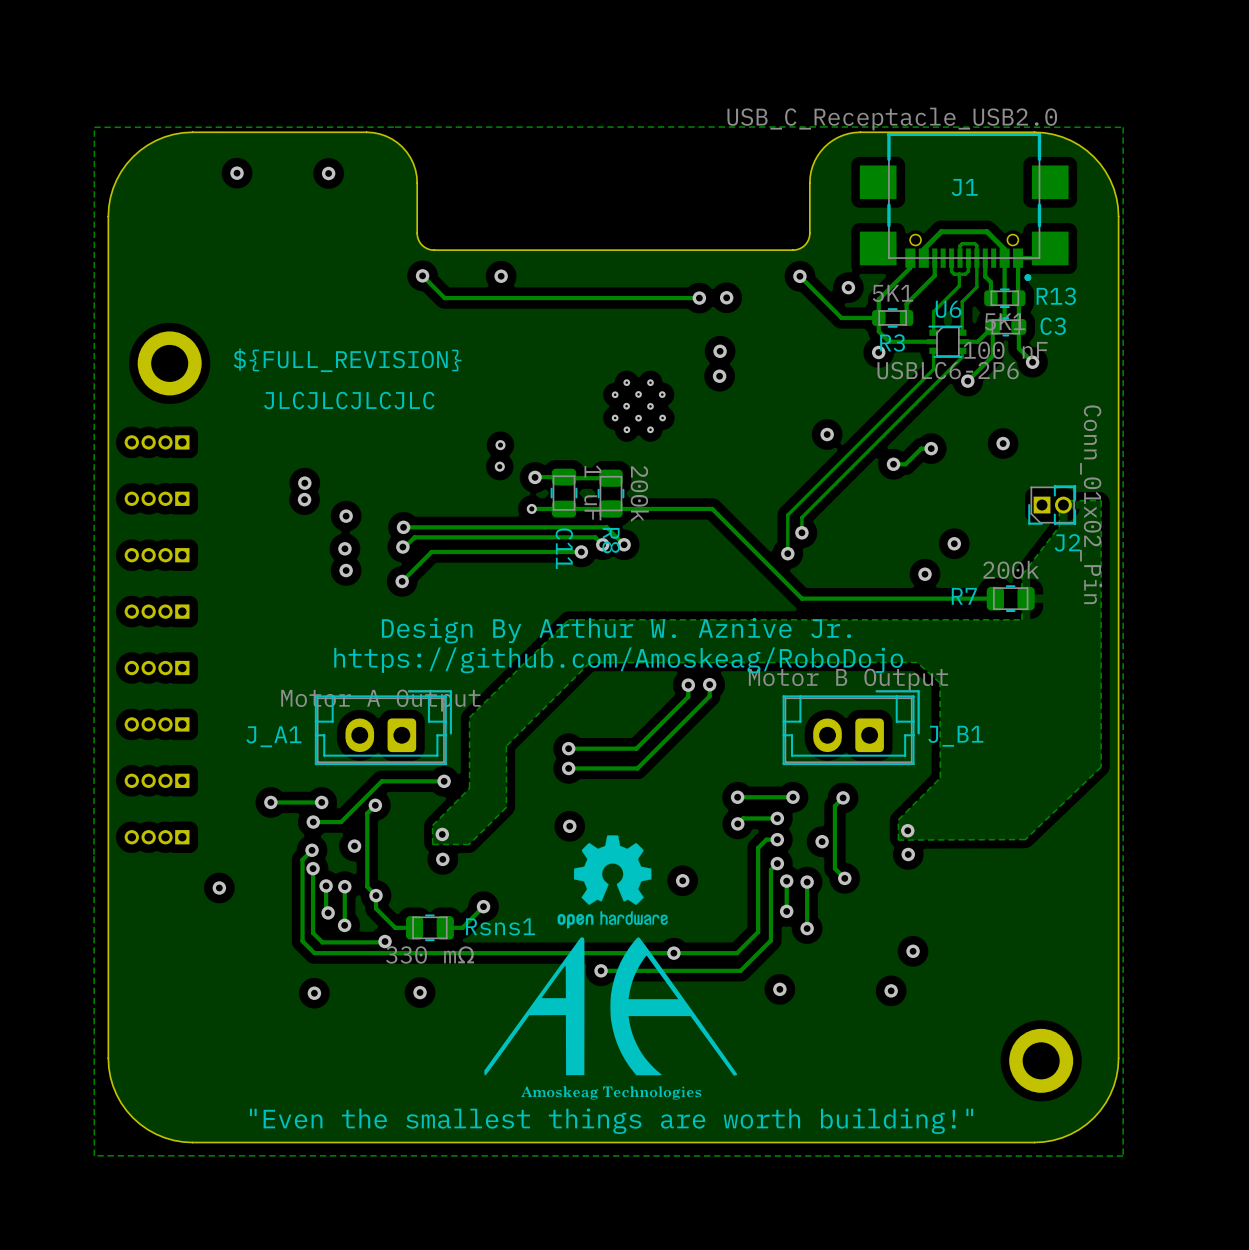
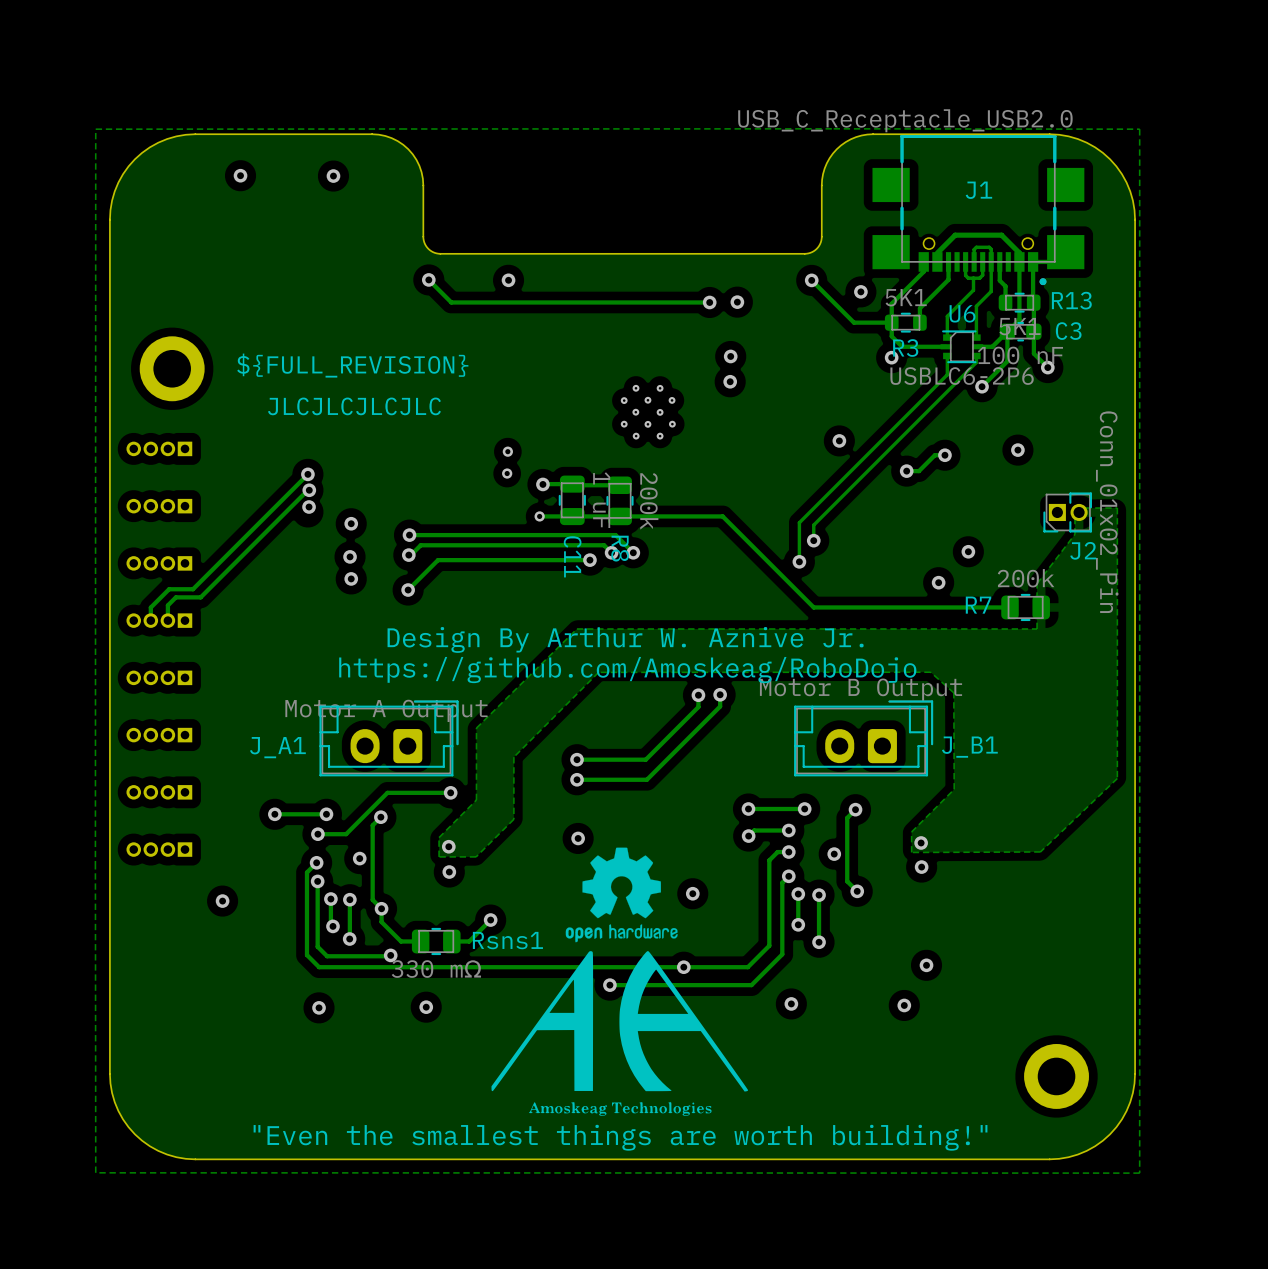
track: none -> (307, 474) (193, 589) (169, 589) (150, 607) (150, 620)
via: none -> (307, 474)
track: none -> (307, 490) (200, 597) (175, 597) (167, 605) (167, 620)

